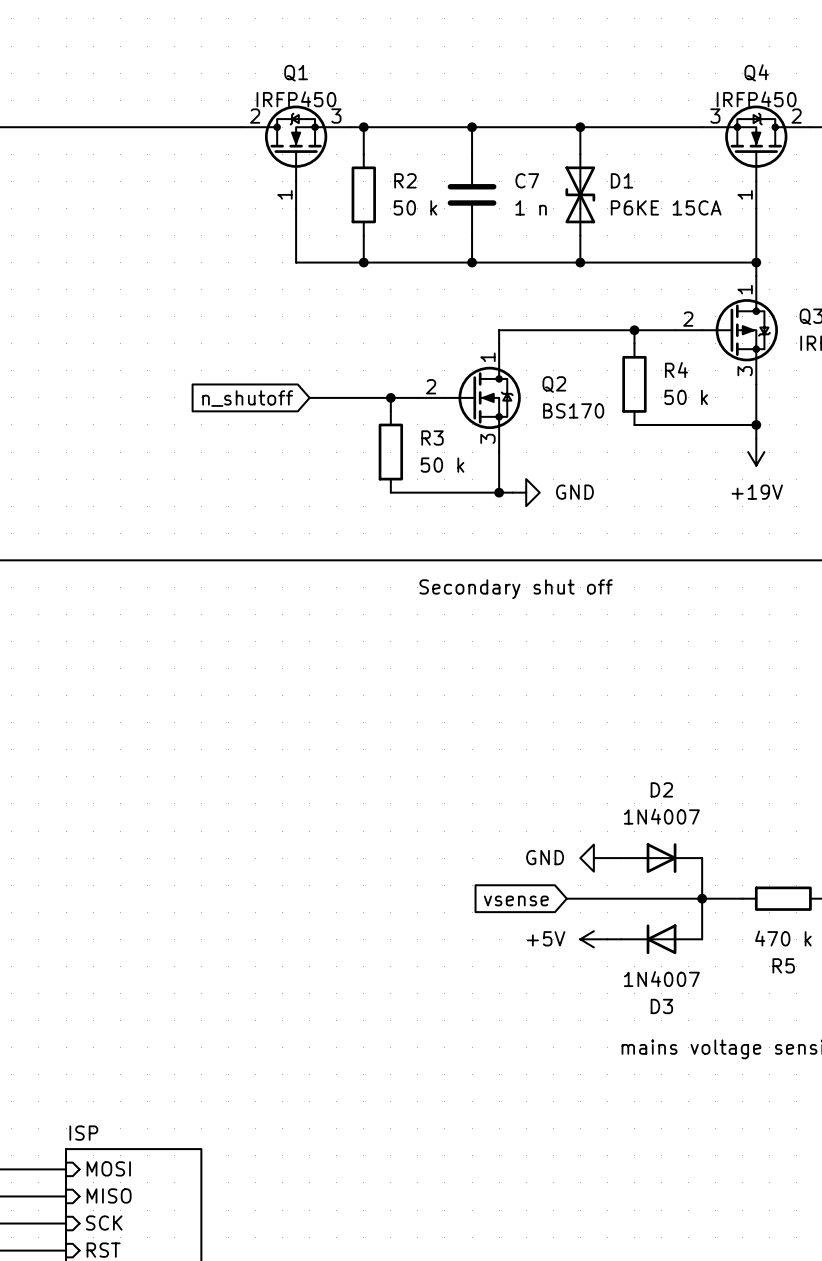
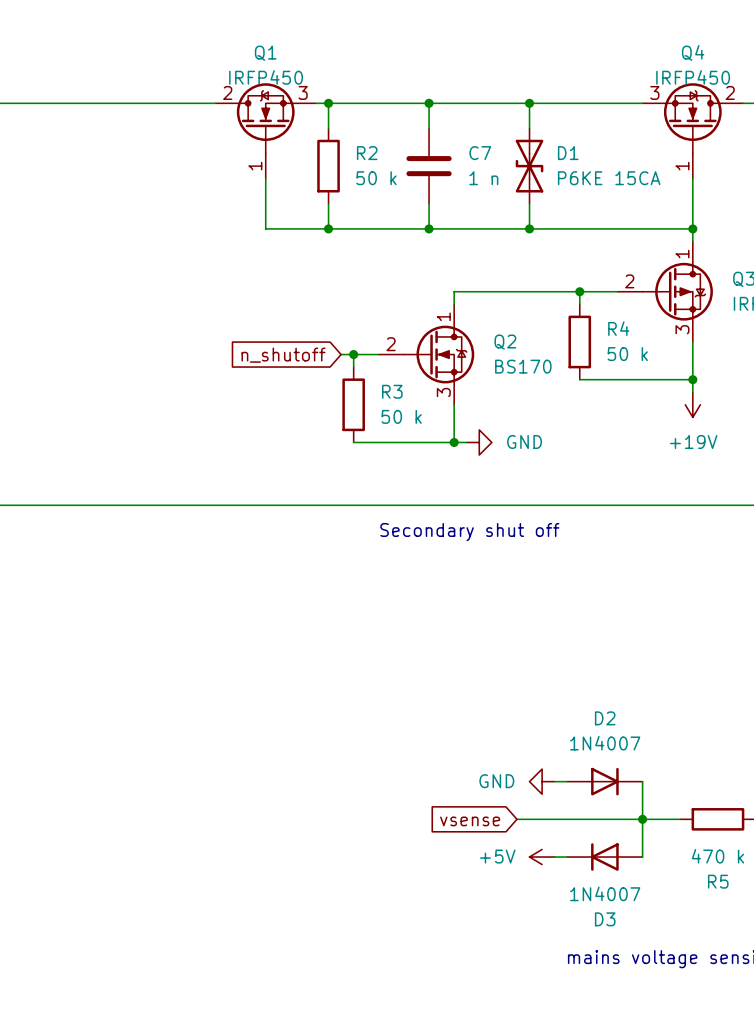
wire: (309, 397) (377, 397) -> none
global label position: n_shutoff (247, 398) -> n_shutoff (283, 355)

